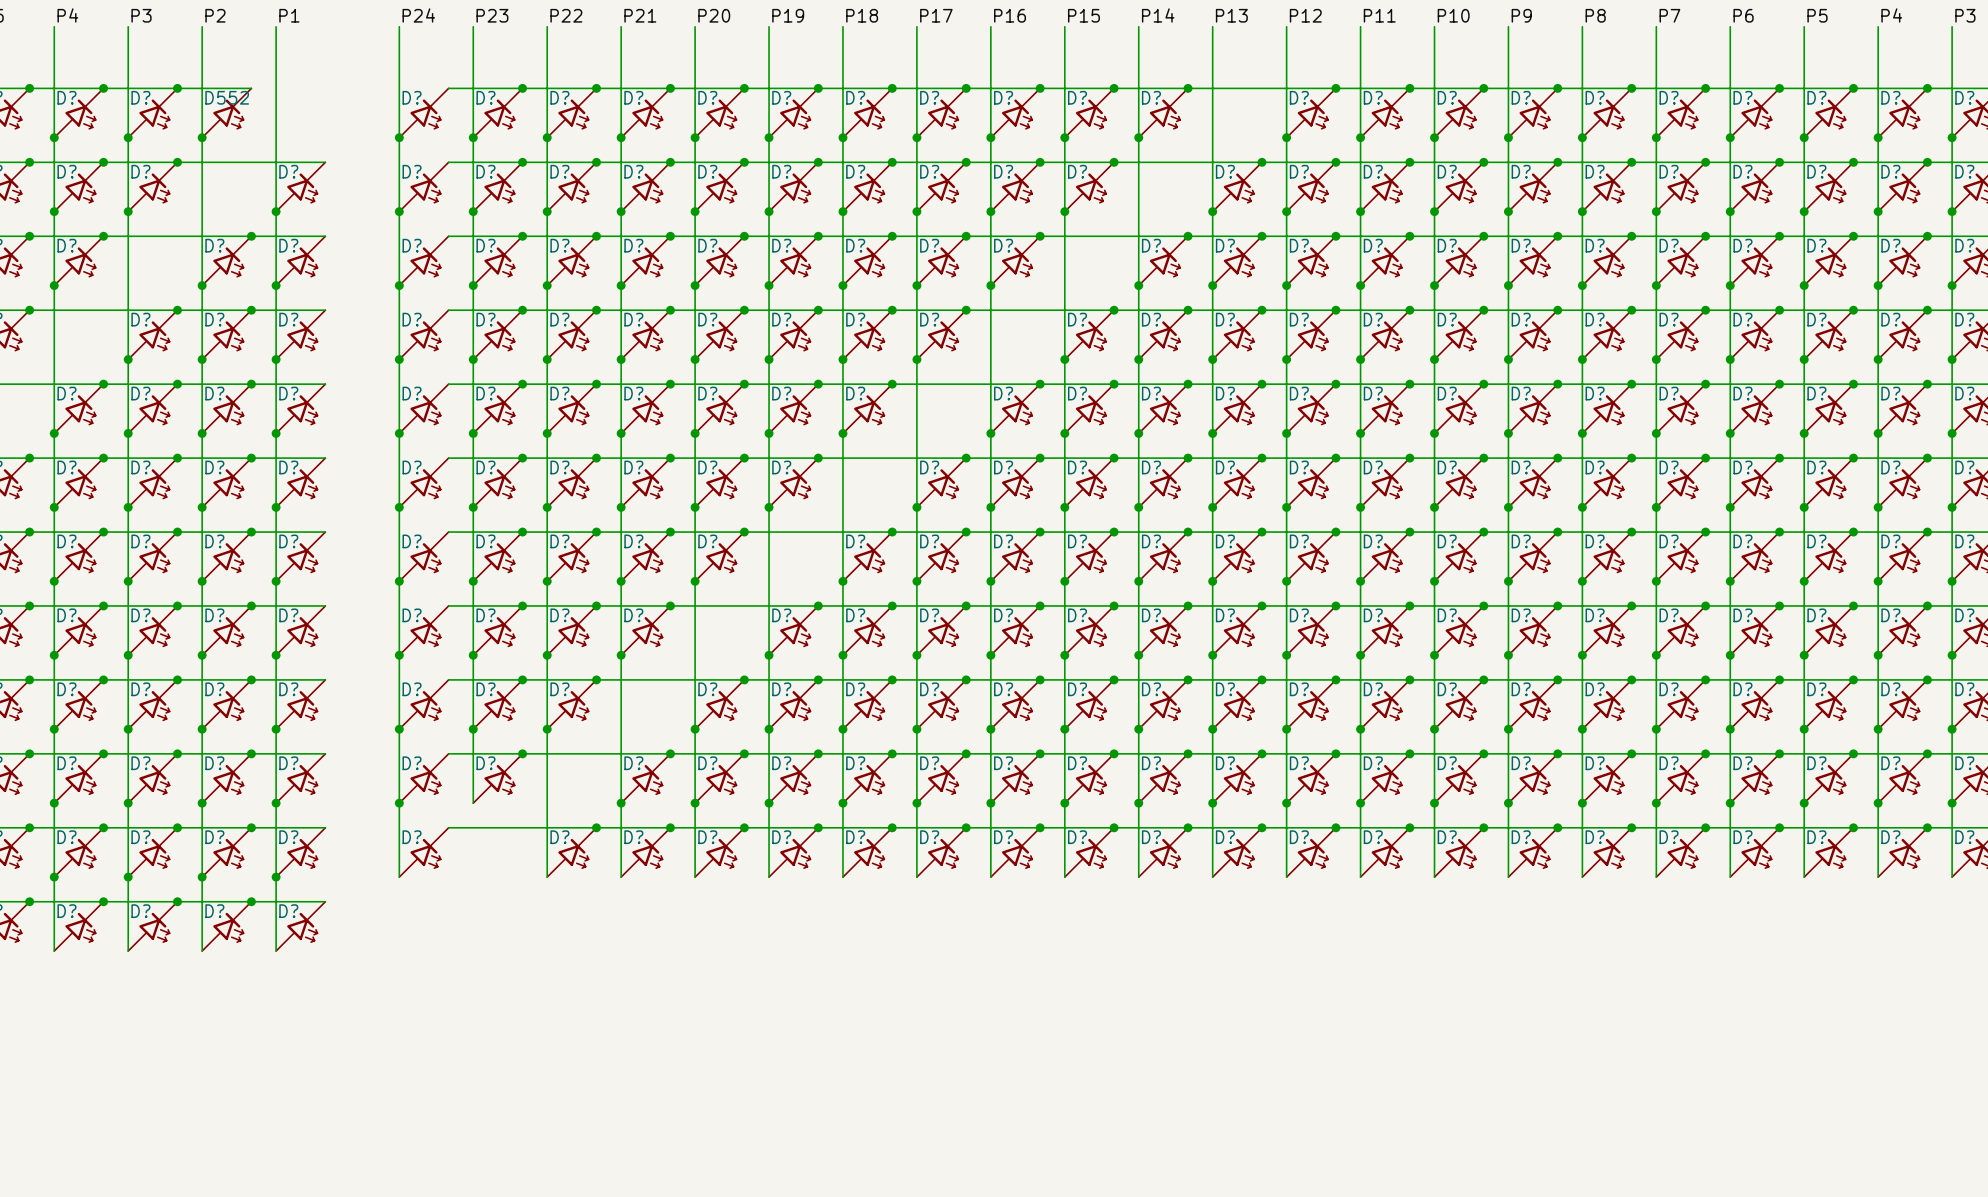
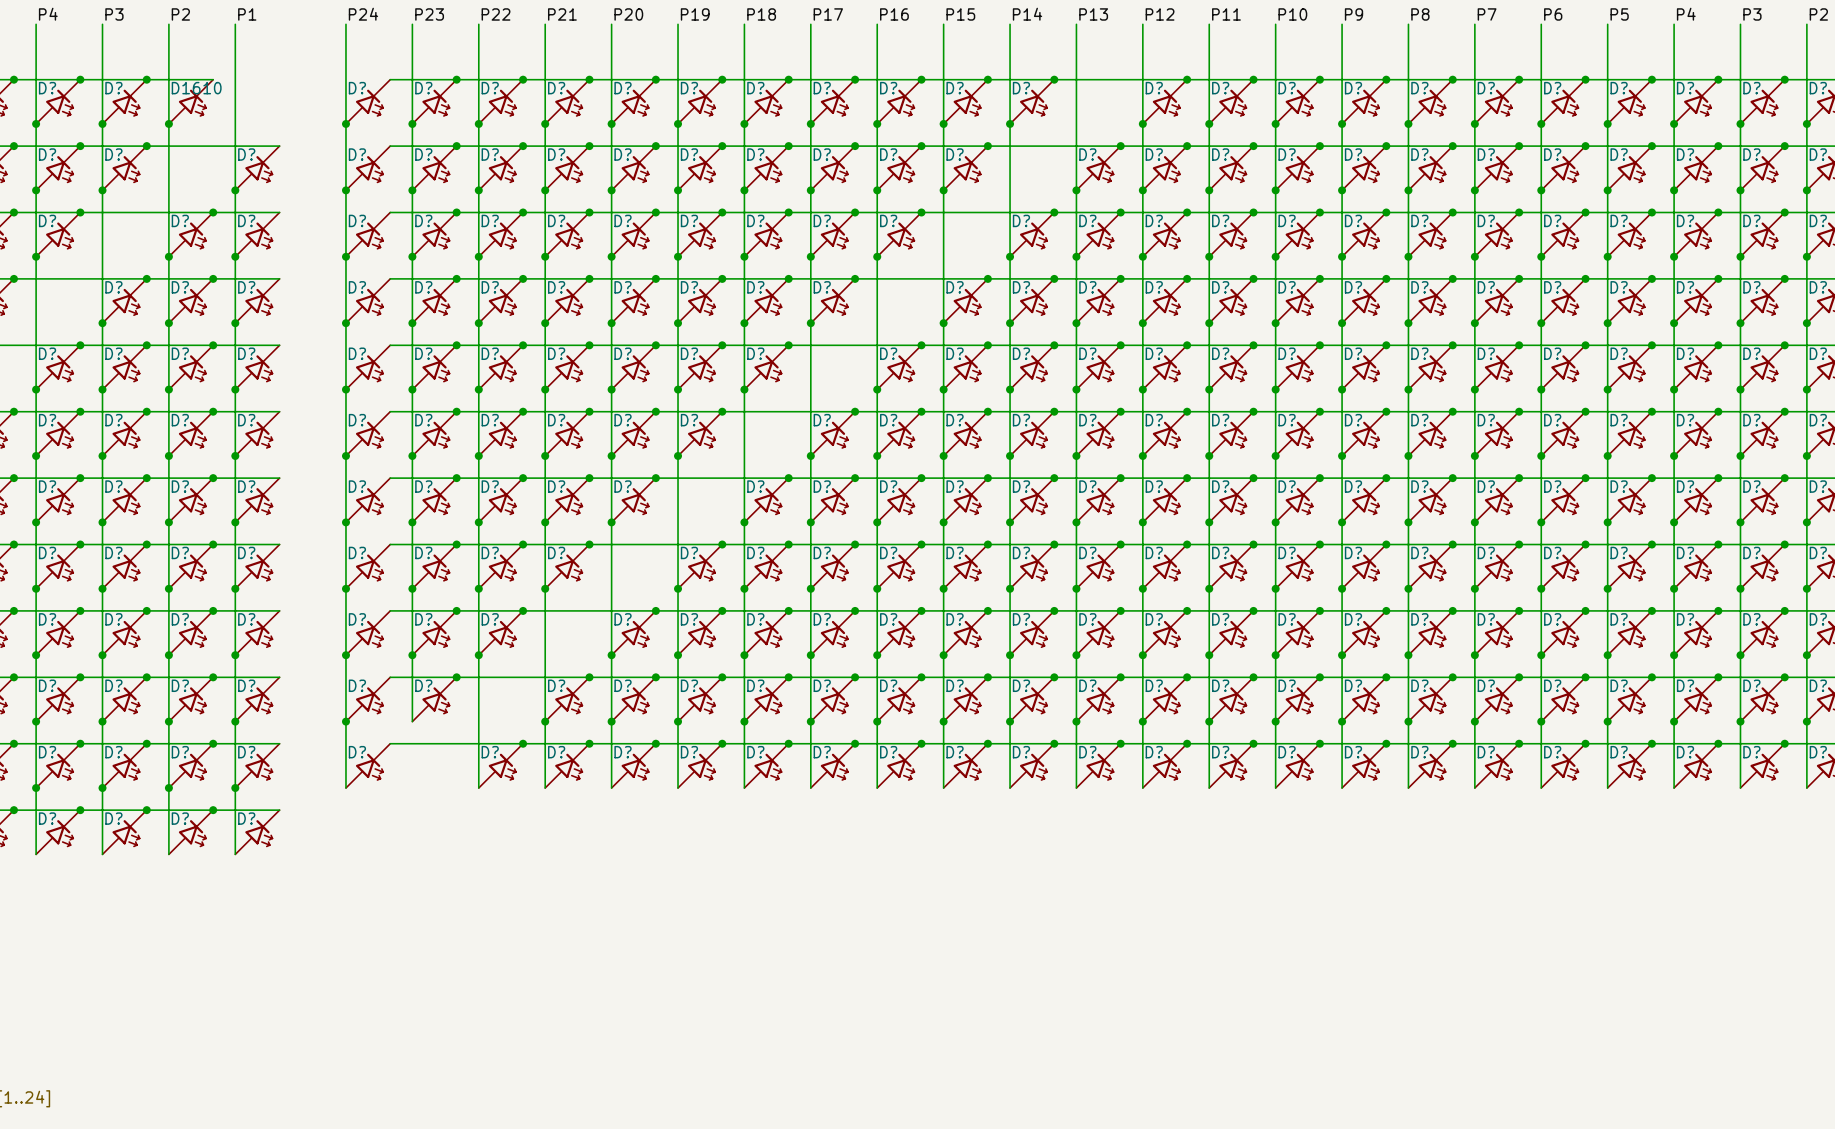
D552 name: D552 (227, 97) -> D1610 (196, 88)

